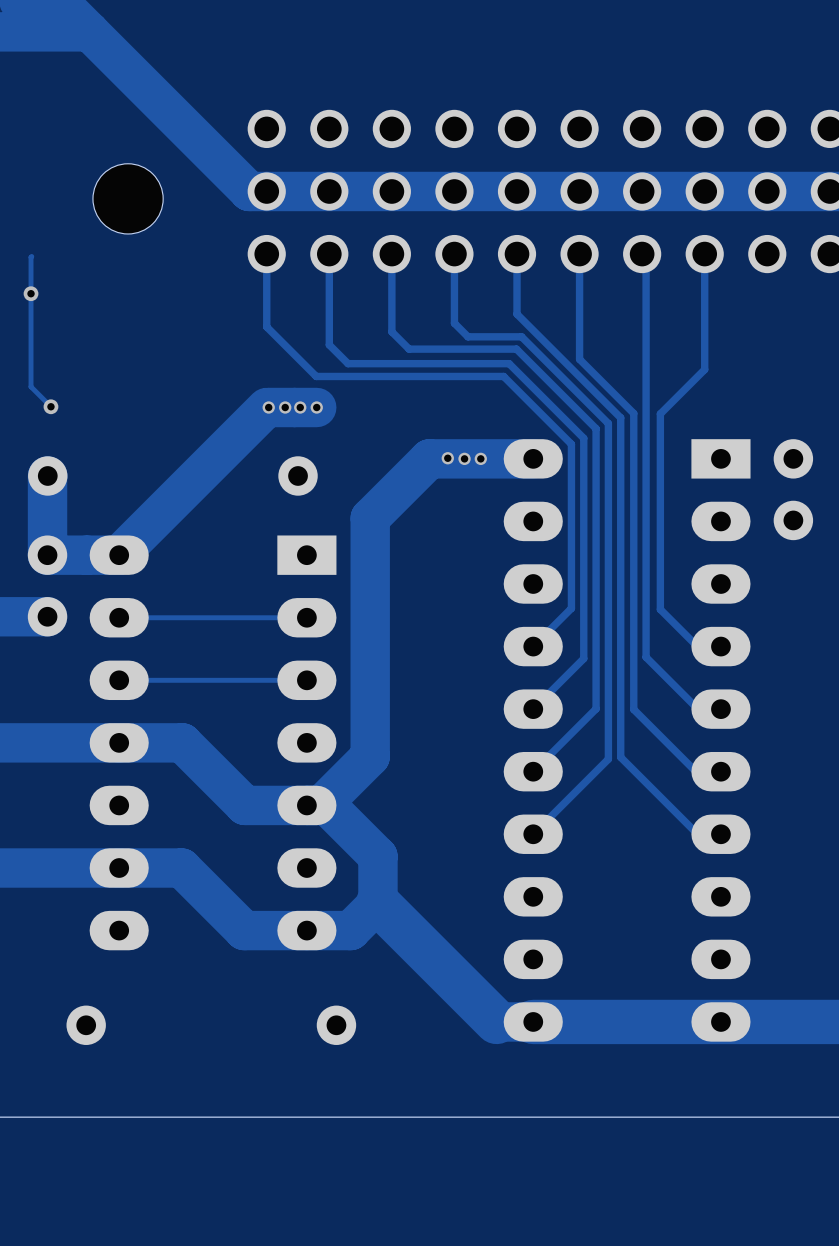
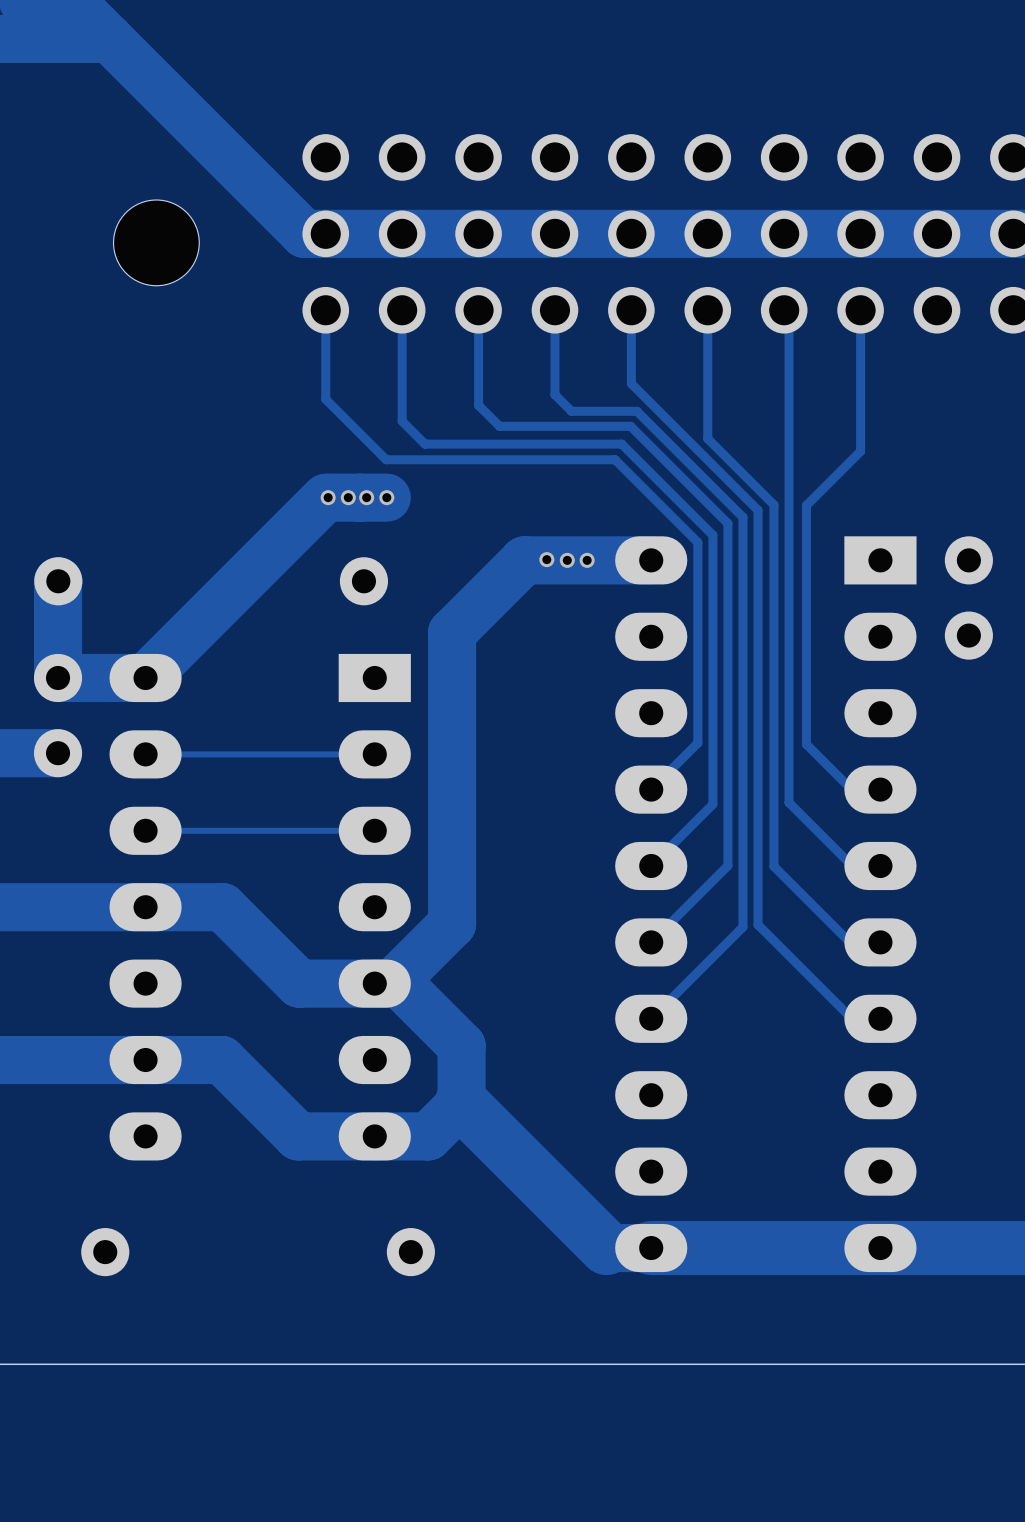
track: (31, 256) (31, 386) (50, 406) -> none
via: (31, 293) -> none
via: (50, 406) -> none

